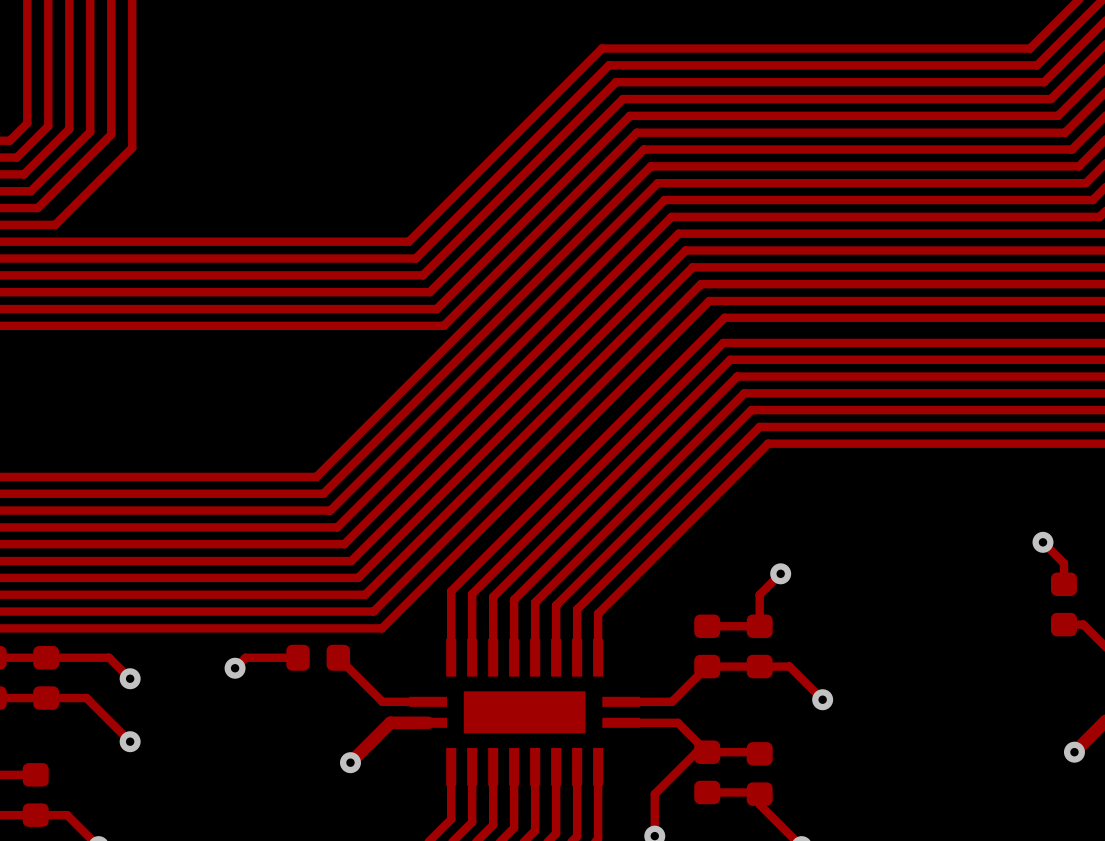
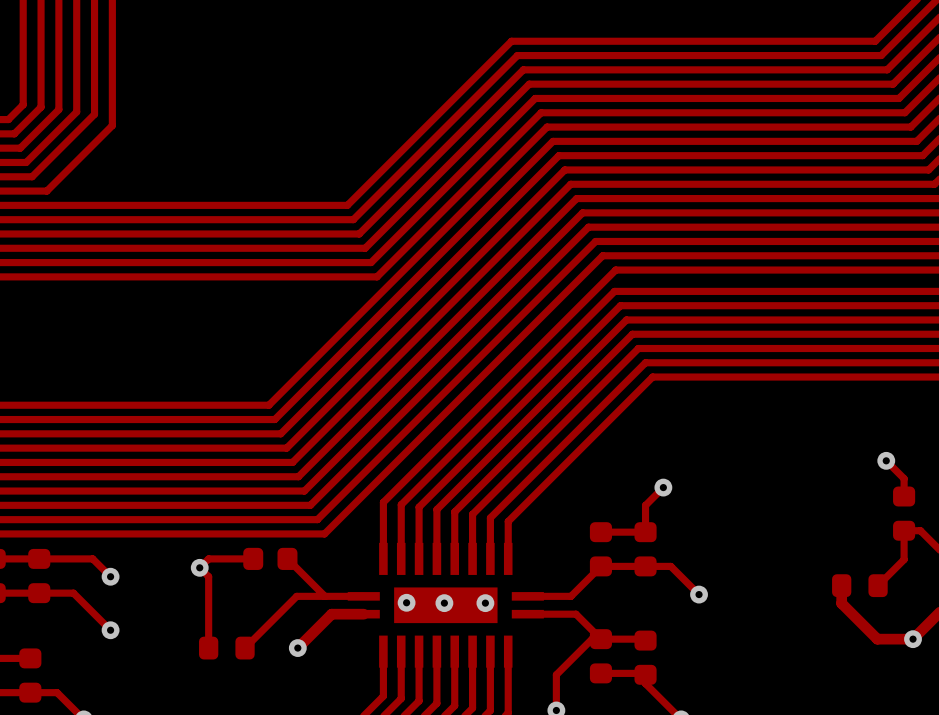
top track: none -> (904, 530) (904, 559) (878, 585)
top track: none -> (199, 567) (208, 576) (208, 648)
top track: none -> (841, 585) (841, 603) (877, 639) (913, 639)
part: none -> (859, 585)
top track: none -> (324, 596) (296, 596) (245, 648)
via: none -> (406, 602)
via: none -> (444, 603)
via: none -> (485, 603)
part: none -> (226, 648)

